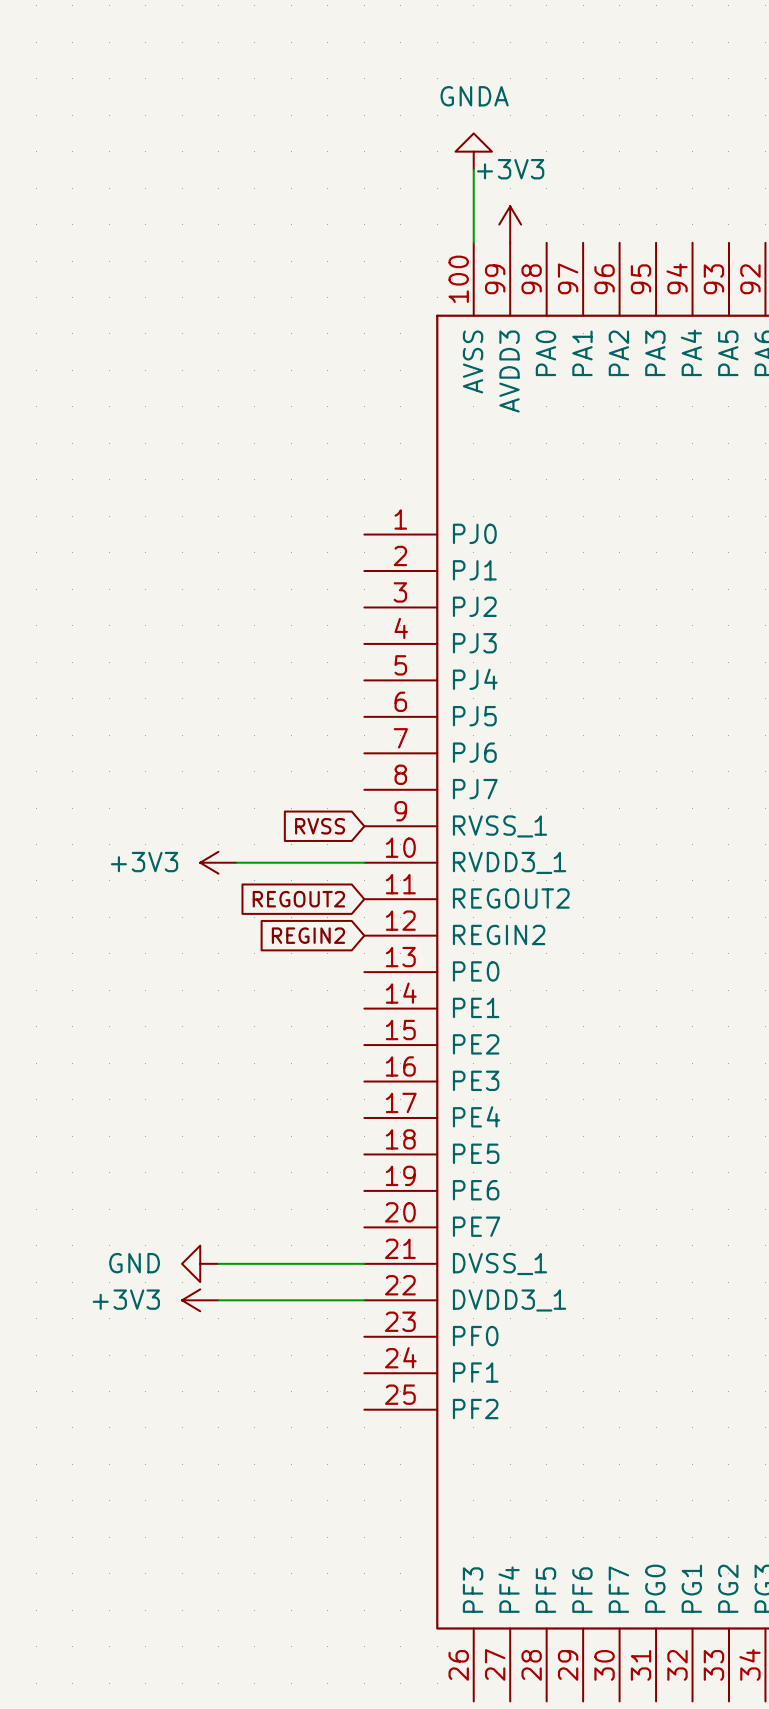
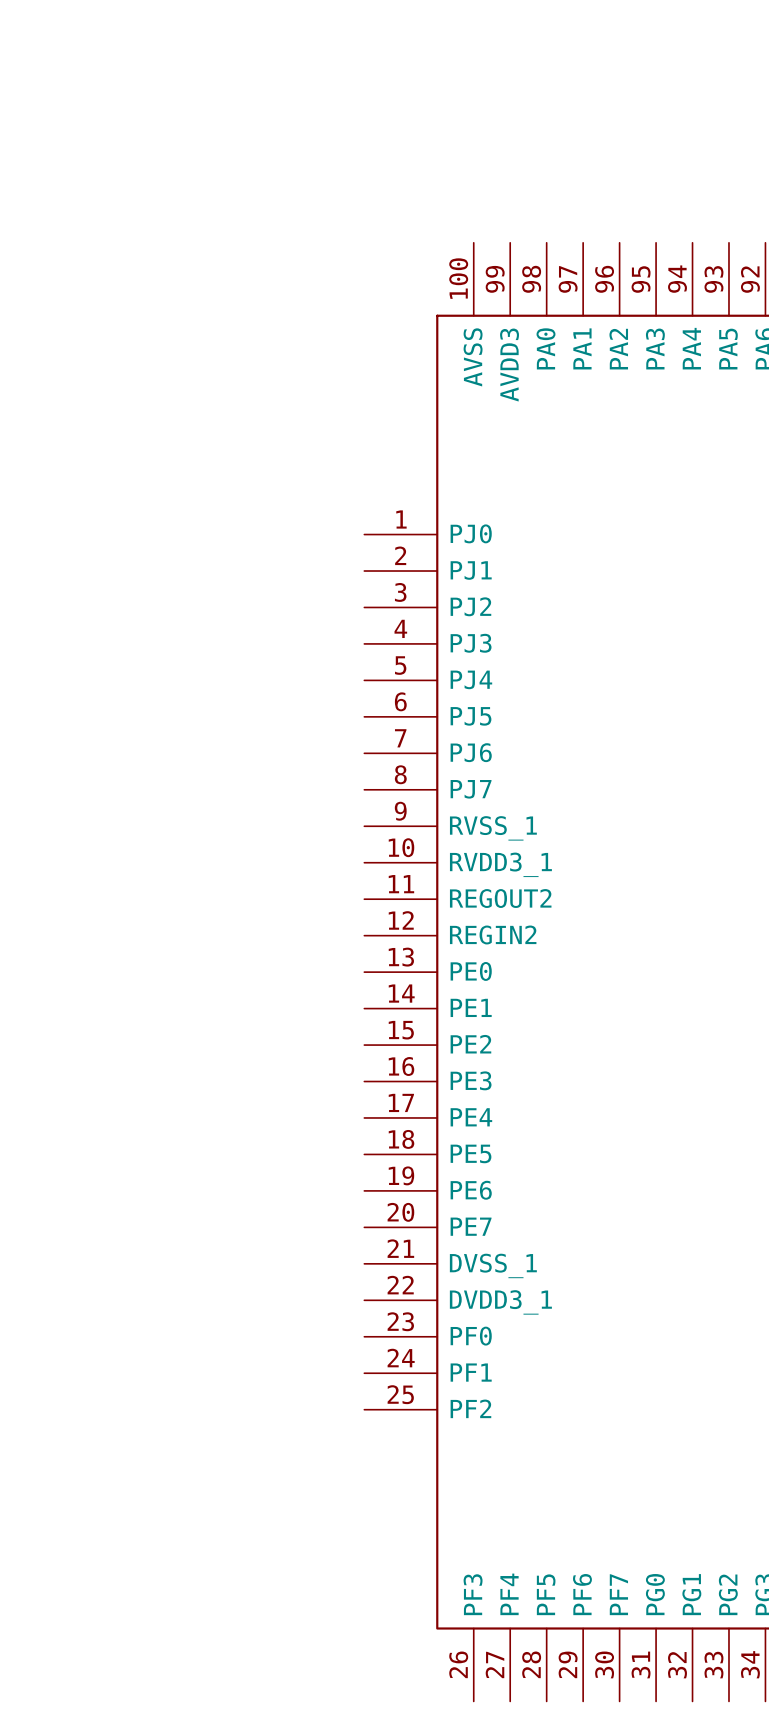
power symbol: GNDA (473, 151) -> none
wire: (473, 169) (473, 242) -> none
power symbol: +3V3 (510, 224) -> none
global label: RVSS (320, 826) -> none
power symbol: +3V3 (218, 862) -> none
wire: (236, 862) (364, 862) -> none
global label: REGOUT2 (298, 899) -> none
global label: REGIN2 (308, 935) -> none
power symbol: GND (200, 1263) -> none
wire: (218, 1263) (364, 1263) -> none
power symbol: +3V3 (200, 1300) -> none
wire: (218, 1300) (364, 1300) -> none

